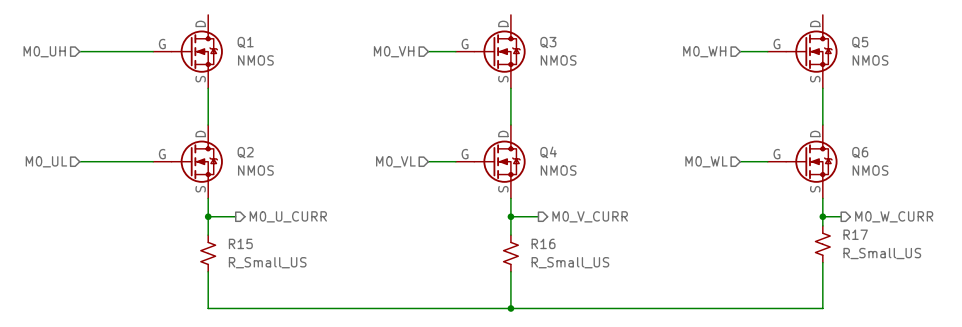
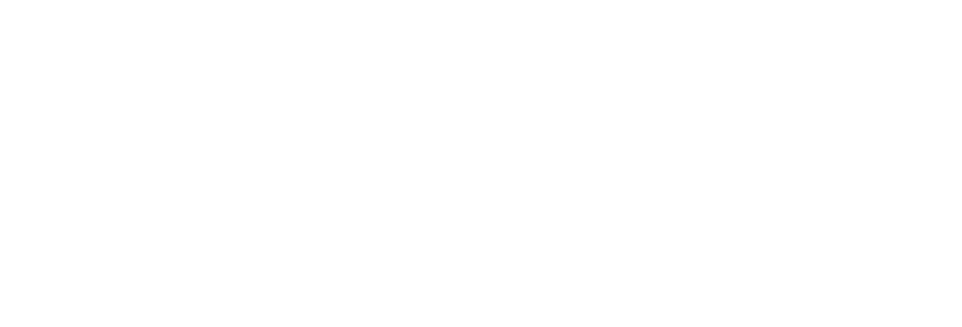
hierarchical label: M0_UH (44, 51) -> none
wire: (79, 51) (153, 51) -> none
Q1: NMOS (188, 51) -> none
hierarchical label: M0_VH (394, 51) -> none
wire: (428, 51) (455, 51) -> none
Q3: NMOS (490, 51) -> none
hierarchical label: M0_WH (704, 51) -> none
wire: (740, 51) (767, 51) -> none
Q5: NMOS (802, 51) -> none
wire: (208, 88) (208, 125) -> none
wire: (510, 88) (510, 125) -> none
wire: (822, 88) (822, 125) -> none
hierarchical label: M0_UL (46, 161) -> none
wire: (79, 161) (153, 161) -> none
Q2: NMOS (188, 161) -> none
hierarchical label: M0_VL (395, 161) -> none
wire: (428, 161) (455, 161) -> none
Q4: NMOS (490, 161) -> none
hierarchical label: M0_WL (706, 161) -> none
wire: (740, 161) (767, 161) -> none
Q6: NMOS (802, 161) -> none
wire: (208, 198) (208, 235) -> none
wire: (510, 198) (510, 235) -> none
wire: (822, 198) (822, 225) -> none
wire: (208, 216) (235, 216) -> none
junction: (208, 216) -> none
hierarchical label: M0_U_CURR (288, 216) -> none
wire: (510, 216) (538, 216) -> none
junction: (510, 216) -> none
hierarchical label: M0_V_CURR (590, 216) -> none
wire: (822, 216) (841, 216) -> none
junction: (822, 216) -> none
hierarchical label: M0_W_CURR (894, 216) -> none
R17: R_Small_US (822, 244) -> none
R15: R_Small_US (208, 253) -> none
R16: R_Small_US (510, 253) -> none
wire: (822, 262) (822, 308) (208, 308) (208, 271) -> none
wire: (510, 271) (510, 308) -> none
junction: (510, 308) -> none

